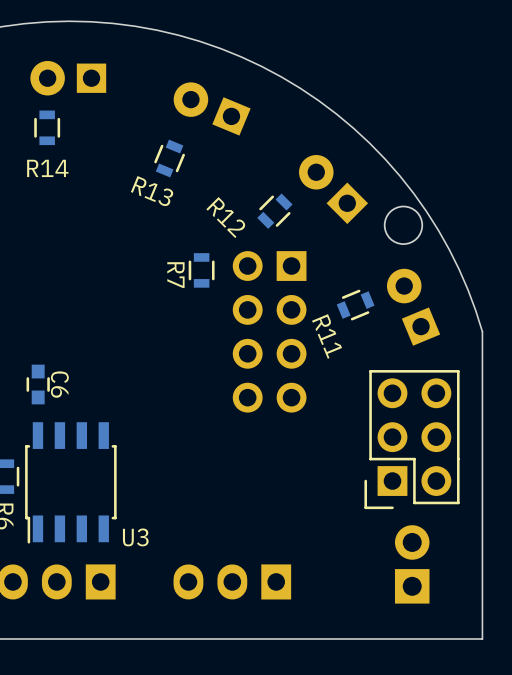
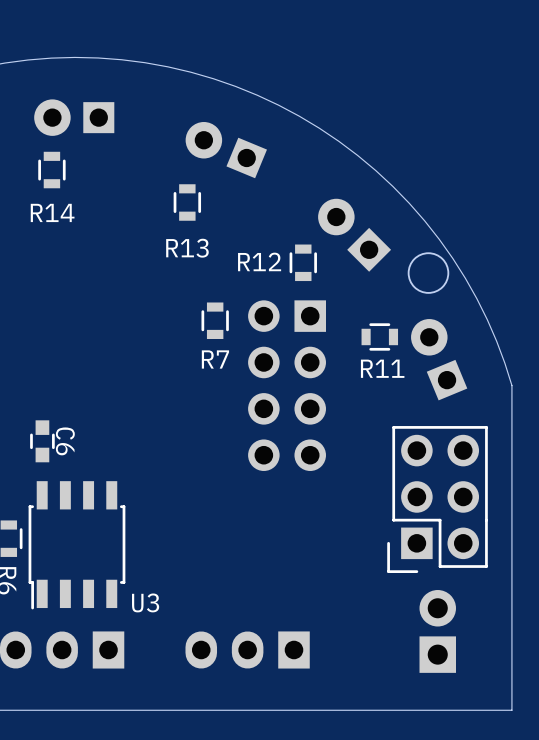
R13 rotation: 0° (169, 158) -> 22.5° counterclockwise (187, 202)
R12 rotation: 0° (274, 211) -> 45° counterclockwise (303, 262)
R7 name rotation: 0° (175, 275) -> 90° counterclockwise (215, 359)
R11 rotation: 0° (355, 305) -> 22.5° clockwise (379, 336)

